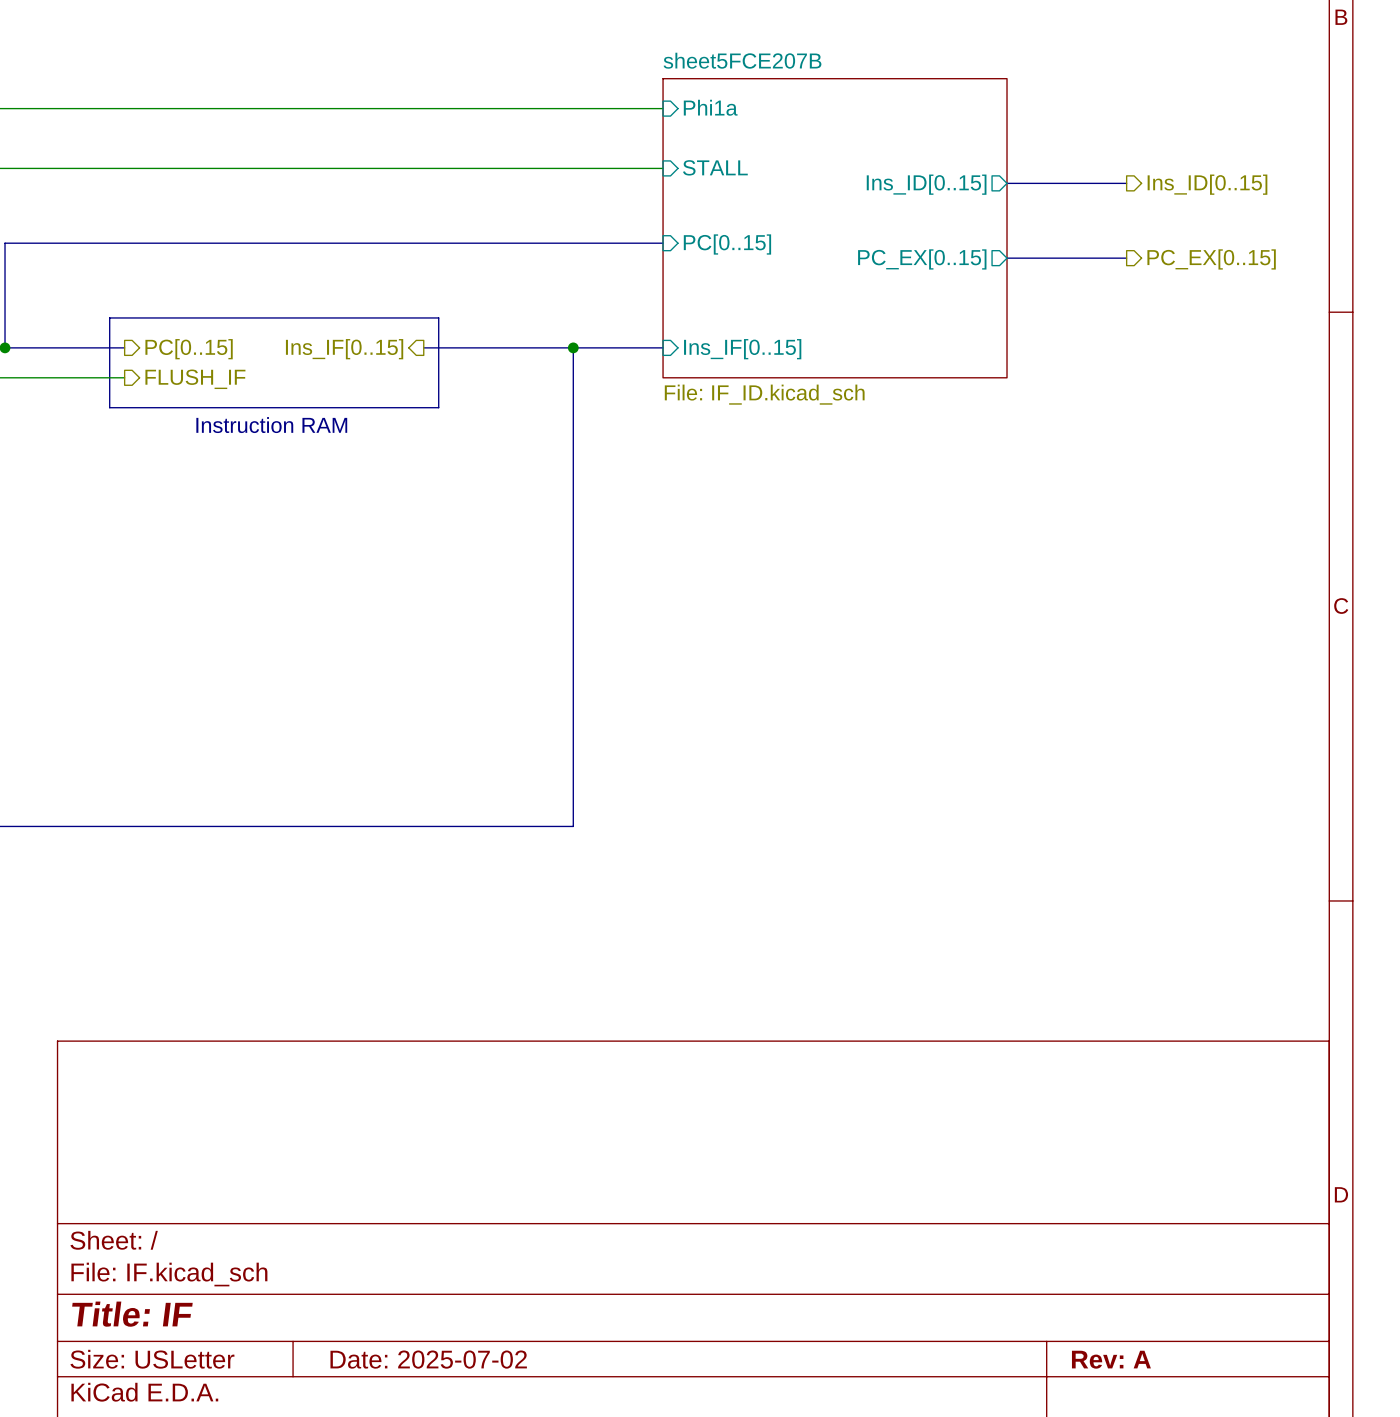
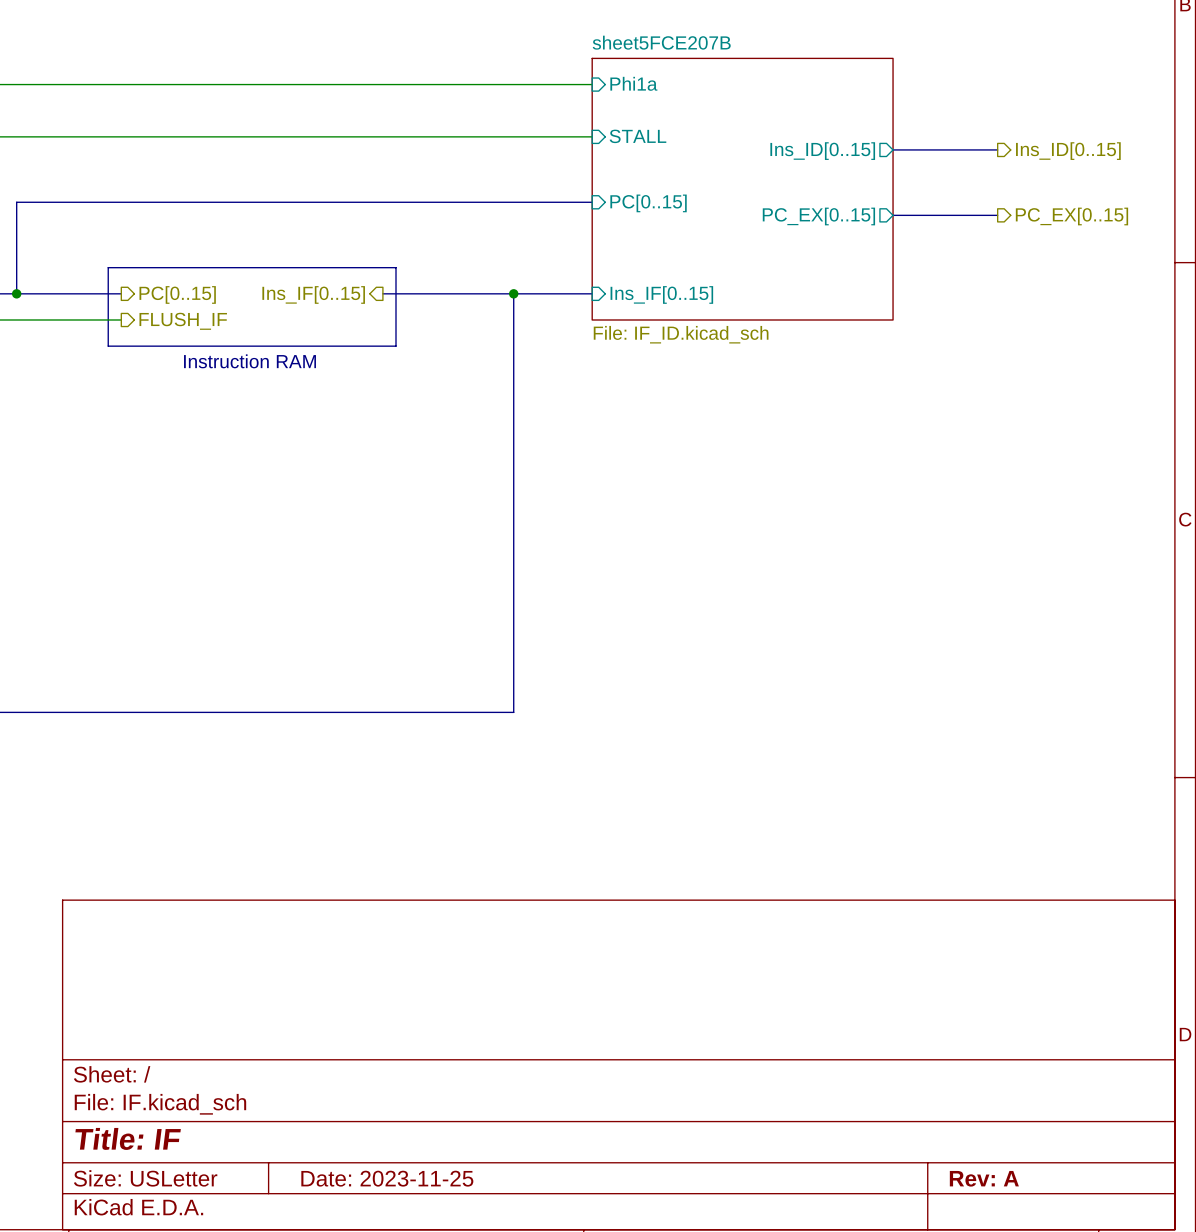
title block: Date: 2025-07-02 (428, 1359) -> Date: 2023-11-25 (387, 1178)

